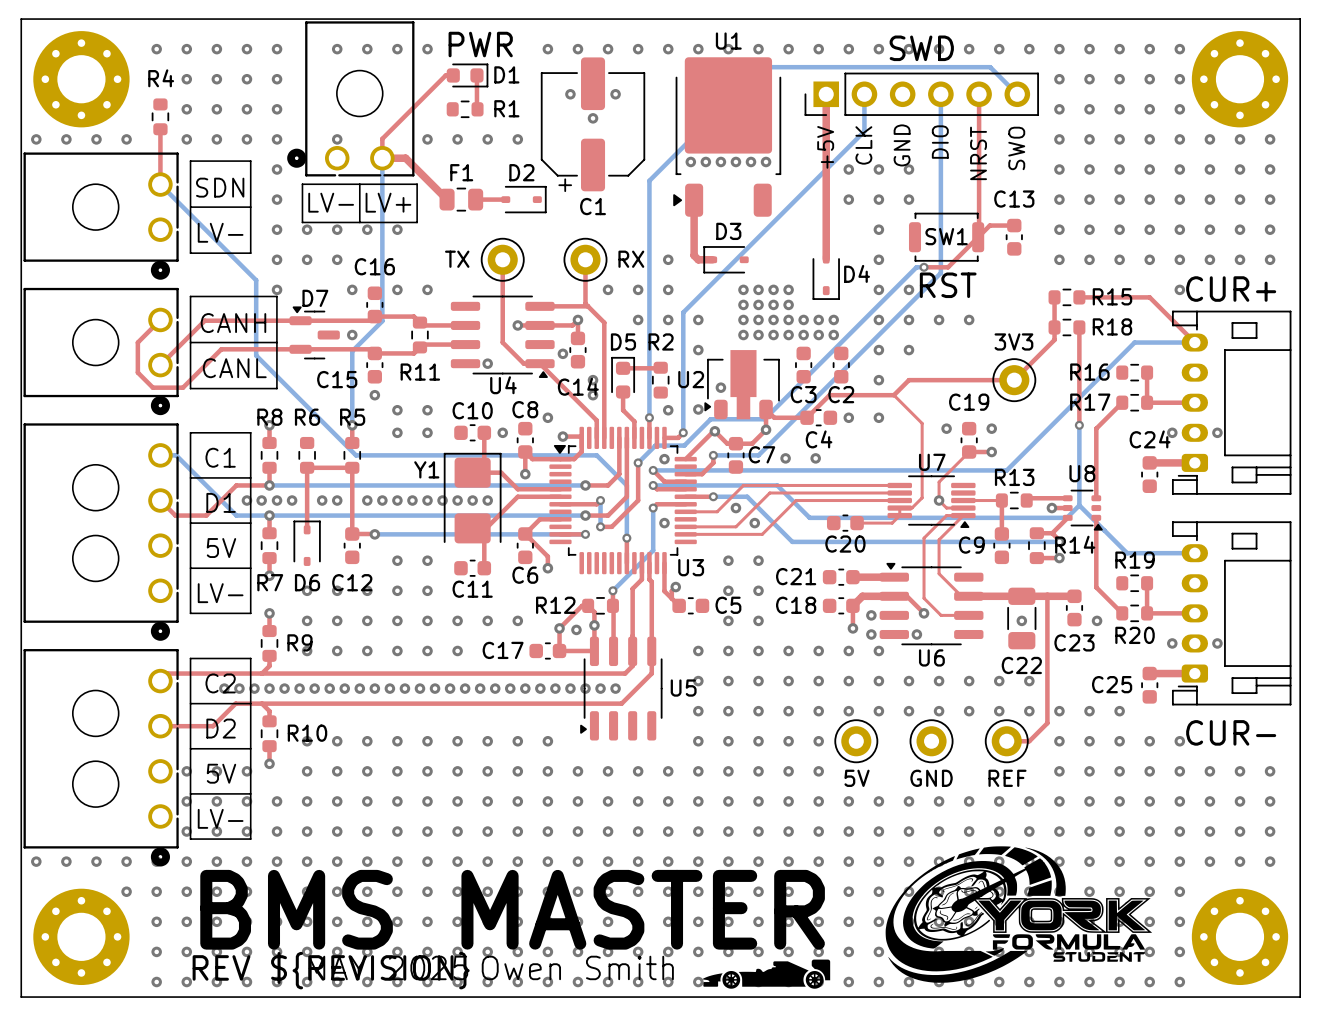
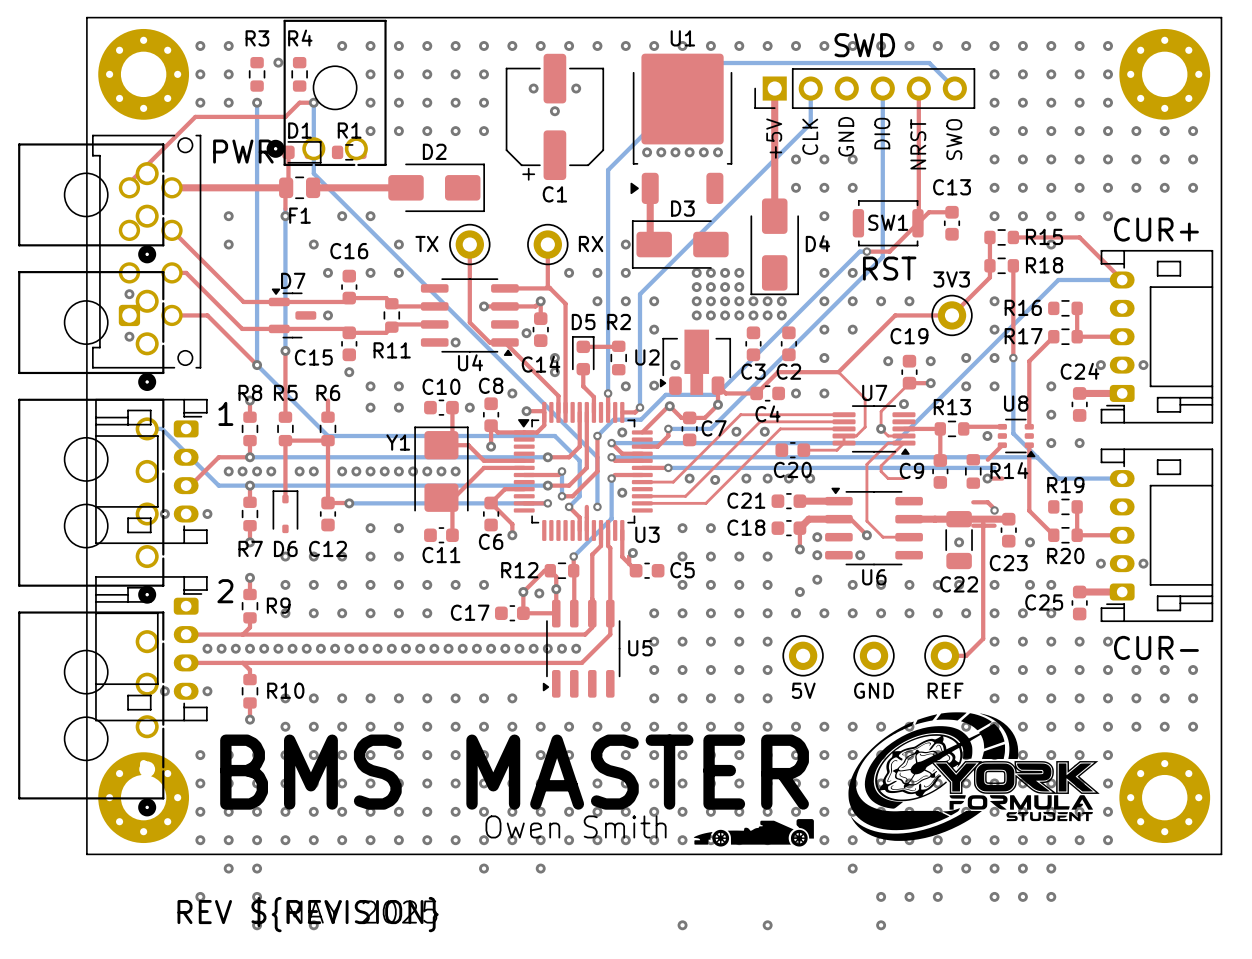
board edge: (96, 19) (21, 19) (21, 997) (1300, 997) (1300, 906) -> (86, 17) (86, 854) (1221, 854)
text position: PWR (480, 44) -> PWR (243, 151)
via: (156, 49) -> none
via: (186, 49) -> none
via: (277, 49) -> none
via: (337, 49) -> none
via: none -> (427, 45)
via: none -> (455, 45)
via: none -> (484, 45)
via: none -> (278, 62)
D1 name position: D1 (506, 74) -> D1 (299, 130)
top track: (453, 75) (445, 75) (382, 138) (382, 158) (405, 158) (447, 199) -> none
D1 position: (467, 75) -> (301, 152)
top track: (476, 75) (477, 109) -> none
part position: (81, 79) -> (143, 74)
via: (186, 79) -> none
R3: none -> (257, 74)
via: (277, 79) -> none
via: none -> (370, 74)
via: none -> (398, 74)
via: none -> (427, 74)
via: none -> (455, 74)
via: none -> (484, 74)
R1 name position: R1 (506, 108) -> R1 (349, 130)
via: (186, 109) -> none
bottom track: none -> (257, 102) (257, 365) (327, 436) (554, 436) (579, 460) (579, 496) (569, 506)
top track: none -> (313, 102) (299, 102) (285, 116) (195, 116) (129, 182)
bottom track: none -> (313, 102) (313, 173) (597, 457) (597, 506)
via: none -> (313, 102)
via: none -> (370, 102)
via: none -> (398, 102)
via: none -> (427, 102)
R1 position: (465, 109) -> (349, 152)
via: none -> (455, 102)
via: none -> (484, 102)
R4 position: (160, 116) -> (299, 74)
top track: (160, 129) (160, 184) -> none
via: (36, 139) -> none
via: (66, 139) -> none
via: (96, 139) -> none
via: (126, 139) -> none
via: (186, 139) -> none
via: (216, 139) -> none
via: (246, 139) -> none
via: (277, 139) -> none
via: (337, 139) -> none
via: none -> (370, 131)
bottom track: (382, 158) (382, 321) (352, 351) (352, 425) -> none
line: (190, 161) (190, 253) (250, 253) (250, 161) (190, 161) -> none
top track: none -> (288, 152) (288, 185)
via: (277, 169) -> none
F1 name position: F1 (461, 172) -> F1 (299, 215)
bottom track: (160, 184) (256, 280) (256, 355) (356, 455) (596, 455) (626, 485) (626, 538) -> none
line: (302, 184) (417, 184) (417, 222) (302, 222) (302, 184) -> none
line: (359, 184) (359, 222) -> none
D2 footprint: [501, 185, 547, 214] -> [388, 163, 485, 213]
text: SDN (220, 187) -> none
top track: none -> (171, 187) (286, 187)
via: (277, 199) -> none
top track: none -> (313, 187) (406, 187)
F1 position: (461, 199) -> (299, 187)
top track: (475, 199) (505, 199) -> none
top track: none -> (285, 188) (285, 209)
text: LV- (331, 202) -> none
text: LV+ (388, 202) -> none
line: (190, 207) (250, 207) -> none
bottom track: none -> (285, 209) (285, 350)
via: none -> (228, 216)
via: (277, 229) -> none
via: (337, 229) -> none
top track: (826, 229) (826, 259) -> none
via: (1209, 229) -> none
via: (1239, 229) -> none
via: (1270, 229) -> none
text: LV- (220, 232) -> none
D3 footprint: [703, 246, 749, 274] -> [631, 220, 729, 269]
D4 footprint: [812, 254, 840, 300] -> [750, 198, 799, 296]
top track: (694, 255) (698, 259) (712, 259) -> none
via: none -> (228, 244)
via: (277, 259) -> none
via: (307, 259) -> none
via: none -> (398, 244)
via: (1059, 259) -> none
via: (1089, 259) -> none
via: (1149, 259) -> none
via: (1179, 259) -> none
via: (1209, 259) -> none
via: (1239, 259) -> none
via: (1270, 259) -> none
part: none -> (146, 251)
via: (277, 289) -> none
via: (1179, 289) -> none
text position: CUR+ (1231, 289) -> CUR+ (1156, 229)
line: (190, 296) (190, 388) (276, 388) (276, 296) (190, 296) -> none
top track: (1054, 297) (1054, 339) (1014, 380) (908, 380) -> (989, 237) (989, 277) (952, 315) (895, 315) (852, 358)
R15 position: (1066, 297) -> (1001, 237)
top track: (1079, 297) (1149, 297) (1194, 342) -> (1013, 237) (1079, 237) (1122, 279)
via: none -> (129, 294)
top track: (160, 319) (137, 342) (137, 372) (152, 387) (183, 387) (221, 349) (261, 349) -> (171, 272) (186, 272) (242, 328)
via: none -> (994, 301)
top track: (262, 320) (204, 320) (160, 365) -> (243, 301) (171, 230)
text: CANH (233, 323) -> none
R18 position: (1066, 327) -> (1001, 265)
top track: none -> (171, 315) (207, 315) (257, 365)
text position: 3V3 (1013, 341) -> 3V3 (951, 279)
line: (190, 342) (276, 342) -> none
bottom track: (1194, 342) (1134, 342) (1006, 470) (954, 470) -> (1122, 279) (1058, 279) (895, 443)
via: none -> (994, 329)
via: none -> (129, 336)
text: CANL (234, 368) -> none
top track: none -> (285, 350) (285, 417)
via: none -> (285, 350)
R16 position: (1134, 372) -> (1065, 308)
top track: (1147, 372) (1147, 402) (1194, 402) -> (1077, 308) (1077, 336) (1122, 336)
part position: (1014, 380) -> (952, 315)
via: none -> (966, 358)
via: none -> (994, 358)
top track: (1079, 380) (1079, 425) -> (1013, 265) (1013, 308)
bottom track: none -> (1013, 358) (1013, 400)
via: none -> (888, 361)
via: none -> (930, 361)
via: none -> (257, 365)
via: none -> (1100, 365)
via: none -> (1143, 365)
top track: (1122, 402) (1096, 428) -> (1053, 336) (1029, 361) (1029, 403)
R17 position: (1134, 402) -> (1065, 336)
part position: (1231, 402) -> (1156, 336)
top track: none -> (930, 383) (909, 383) (881, 411) (881, 428) (888, 436) (903, 436)
via: none -> (930, 383)
via: none -> (966, 386)
via: none -> (994, 386)
via: none -> (1051, 386)
R6 name: R6 (307, 417) -> R5 (285, 392)
R5 name: R5 (352, 417) -> R6 (328, 392)
via: (352, 425) -> none
via position: (1079, 425) -> (1013, 358)
via: (946, 428) -> none
via: (991, 428) -> none
via: none -> (903, 404)
line: (190, 432) (250, 432) (250, 613) (190, 613) (190, 432) -> none
via: (1172, 432) -> none
via: (1217, 432) -> none
C19 position: (969, 440) -> (909, 372)
via: none -> (1051, 414)
top track: (991, 451) (969, 451) (939, 482) (939, 494) -> none
via: (991, 451) -> none
top track: (922, 453) (922, 497) (911, 508) (899, 508) (899, 515) (892, 523) (857, 523) -> (865, 427) (856, 436) (844, 436) (844, 443) (836, 450) (803, 450)
top track: (1096, 453) (1096, 472) -> (1029, 469) (1029, 487)
via: none -> (881, 428)
text: C1 (220, 457) -> 1 (225, 413)
bottom track: (1079, 460) (1079, 505) -> (1013, 433) (1058, 478) (1122, 478)
via: none -> (987, 436)
top track: (1149, 462) (1194, 462) -> (1079, 393) (1122, 393)
via: none -> (1051, 443)
via: none -> (1079, 443)
C24 position: (1149, 474) -> (1079, 404)
line: (190, 477) (250, 477) -> none
bottom track: (777, 485) (809, 517) (1066, 517) (1079, 505) -> (728, 457) (1037, 457)
top track: (899, 485) (743, 485) (717, 511) -> (844, 414) (740, 414) (671, 482)
top track: (899, 492) (769, 492) (735, 526) (731, 526) -> (844, 421) (760, 421) (685, 496)
bottom track: (747, 496) (792, 541) (1059, 541) -> (700, 467) (994, 467)
top track: (1067, 498) (1028, 498) (1026, 500) -> (1002, 426) (965, 426) (963, 428)
top track: (160, 500) (175, 515) (201, 515) -> none
part: none -> (151, 471)
top track: (899, 500) (796, 500) (762, 534) (753, 534) -> (844, 428) (780, 428) (705, 503)
via: (939, 500) -> none
top track: (963, 500) (1001, 500) (1001, 533) -> (903, 428) (940, 428) (940, 460)
R13 position: (1014, 500) -> (952, 428)
U7 position: (931, 501) -> (874, 430)
text: D1 (221, 502) -> none
bottom track: (1079, 505) (1127, 553) (1194, 553) -> none
via: none -> (746, 478)
via: none -> (767, 478)
via: none -> (788, 478)
via: none -> (810, 478)
U8 position: (1082, 510) -> (1016, 437)
top track: (1067, 517) (1052, 533) -> (1002, 445) (987, 459)
line: (190, 523) (250, 523) -> none
via position: (754, 523) -> (715, 479)
C20 position: (845, 523) -> (792, 450)
top track: none -> (569, 506) (579, 517) (579, 530)
via: none -> (569, 506)
via: (626, 538) -> none
via: none -> (597, 506)
top track: (924, 538) (946, 515) (963, 515) (939, 539) (939, 573) (961, 596) -> (866, 506) (866, 464) (888, 443) (903, 443) (881, 465)
top track: (1096, 542) (1096, 587) (1122, 613) -> (1029, 510) (1053, 535)
via: none -> (164, 514)
via: none -> (207, 514)
C9 position: (1001, 545) -> (940, 471)
R14 position: (1036, 545) -> (973, 471)
text: 5V (221, 548) -> none
top track: none -> (983, 519) (983, 561)
top track: (924, 553) (924, 598) (941, 615) (968, 615) -> (866, 521) (883, 537) (909, 537)
via: (1059, 558) -> none
line: (190, 568) (250, 568) -> none
via: none -> (866, 535)
via: none -> (817, 537)
via: none -> (959, 542)
via: none -> (1030, 542)
C21 position: (841, 577) -> (788, 501)
top track: (852, 577) (894, 577) -> (799, 501) (838, 501)
via: none -> (799, 549)
R19 position: (1134, 583) -> (1065, 506)
top track: (1147, 583) (1147, 613) (1194, 613) -> (1077, 506) (1077, 535) (1122, 535)
via: none -> (817, 555)
via: none -> (860, 555)
via: none -> (739, 556)
via: none -> (767, 556)
text: LV- (220, 593) -> none
top track: (968, 596) (1074, 596) -> (909, 519) (1008, 519)
via: none -> (1100, 563)
via: none -> (1143, 563)
U6 position: (931, 604) -> (874, 526)
C18 position: (841, 605) -> (788, 528)
C23 position: (1074, 607) -> (1008, 530)
top track: (924, 613) (906, 596) (862, 596) (852, 605) (852, 628) -> (866, 535) (850, 519) (808, 519) (799, 528) (799, 549)
via: (924, 613) -> none
R20 position: (1134, 613) -> (1065, 535)
part position: (1231, 613) -> (1156, 535)
C22 position: (1021, 618) -> (959, 540)
via: none -> (739, 584)
via: none -> (767, 584)
via: none -> (852, 584)
via: none -> (881, 584)
via: none -> (909, 584)
via: none -> (937, 584)
via: none -> (994, 584)
via: none -> (1051, 584)
text: none -> 2 (225, 591)
via: (871, 634) -> none
via: (916, 634) -> none
via: (1172, 643) -> none
via: (1217, 643) -> none
via: none -> (852, 613)
via: none -> (881, 613)
via: none -> (909, 613)
via: none -> (937, 613)
via: none -> (966, 613)
via: none -> (994, 613)
via: none -> (1022, 613)
via: none -> (1051, 613)
line: (190, 658) (190, 839) (250, 839) (250, 658) (190, 658) -> none
top track: (201, 673) (167, 673) (160, 681) -> none
top track: (1149, 673) (1194, 673) -> (1079, 592) (1122, 592)
top track: (1047, 678) (1047, 723) (1029, 741) (1006, 741) -> (983, 638) (966, 655) (944, 655)
via: (848, 681) -> none
via: (878, 681) -> none
via: (908, 681) -> none
via: (939, 681) -> none
via: (969, 681) -> none
via: (999, 681) -> none
via: (1029, 681) -> none
via: none -> (994, 641)
via: none -> (1022, 641)
via: none -> (1051, 641)
via: none -> (1079, 641)
via: none -> (1108, 641)
text: C2 (220, 683) -> none
C25 position: (1149, 685) -> (1079, 602)
part: none -> (151, 648)
part: none -> (803, 655)
part: none -> (874, 655)
part: none -> (944, 655)
line: (190, 703) (250, 703) -> none
top track: (235, 703) (213, 726) (160, 726) -> (218, 662) (186, 662)
via: (848, 711) -> none
via: (878, 711) -> none
via: (908, 711) -> none
via: (939, 711) -> none
via: (969, 711) -> none
via: (999, 711) -> none
via: (1029, 711) -> none
via: none -> (1079, 670)
via: none -> (1108, 670)
via: none -> (1136, 670)
via: none -> (1164, 670)
via: none -> (1193, 670)
text: D2 (221, 728) -> none
text position: CUR- (1231, 732) -> CUR- (1156, 647)
via: none -> (164, 691)
via: none -> (207, 691)
part: (856, 741) -> none
part: (931, 741) -> none
part: (1006, 741) -> none
via: none -> (1136, 698)
via: none -> (1164, 698)
via: none -> (1193, 698)
line: (190, 748) (250, 748) -> none
via: (186, 771) -> none
via: (216, 771) -> none
via: (246, 771) -> none
via: none -> (796, 726)
via: none -> (824, 726)
via: none -> (852, 726)
via: none -> (881, 726)
via: none -> (909, 726)
via: none -> (966, 726)
text: 5V (221, 773) -> none
text position: 5V (857, 778) -> 5V (803, 690)
text position: GND (931, 778) -> GND (874, 690)
text position: REF (1007, 778) -> REF (945, 690)
line: (190, 793) (250, 793) -> none
via: (186, 801) -> none
via: (1209, 801) -> none
via: (1239, 801) -> none
via: (1270, 801) -> none
text: LV- (220, 818) -> none
via: (186, 831) -> none
via: (1209, 831) -> none
via: (1239, 831) -> none
via: (1270, 831) -> none
via: (36, 861) -> none
via: (66, 861) -> none
via: (96, 861) -> none
via: (126, 861) -> none
via: (186, 861) -> none
via: (1209, 861) -> none
via: (1239, 861) -> none
via: (1270, 861) -> none
drawing: none -> [712, 829, 730, 847]
drawing: none -> [790, 829, 808, 847]
via: (126, 891) -> none
via: (156, 891) -> none
via: (186, 891) -> none
text position: BMS MASTER (512, 909) -> BMS MASTER (514, 772)
drawing position: (1018, 914) -> (974, 776)
via: (156, 921) -> none
via: (186, 921) -> none
via: (216, 921) -> none
via: (307, 921) -> none
via: (337, 921) -> none
via: (367, 921) -> none
via: (397, 921) -> none
via: (427, 921) -> none
via: (457, 921) -> none
via: (608, 921) -> none
via: (668, 921) -> none
via: (698, 921) -> none
via: (728, 921) -> none
via: (758, 921) -> none
via: (788, 921) -> none
via: (818, 921) -> none
via: (848, 921) -> none
via: (878, 921) -> none
via: (939, 921) -> none
via: (969, 921) -> none
via: (1149, 921) -> none
via: (1179, 921) -> none
part position: (81, 936) -> (143, 797)
part position: (1239, 936) -> (1164, 797)
via: (156, 951) -> none
via: (186, 951) -> none
via: (246, 951) -> none
via: (307, 951) -> none
via: (337, 951) -> none
via: (367, 951) -> none
via: (397, 951) -> none
via: (427, 951) -> none
via: (457, 951) -> none
via: (487, 951) -> none
via: (517, 951) -> none
via: (547, 951) -> none
via: (577, 951) -> none
via: (608, 951) -> none
via: (638, 951) -> none
via: (668, 951) -> none
via: (698, 951) -> none
via: (728, 951) -> none
via: (758, 951) -> none
via: (788, 951) -> none
via: (818, 951) -> none
via: (848, 951) -> none
via: (878, 951) -> none
via: (1029, 951) -> none
via: (1149, 951) -> none
via: (1179, 951) -> none
text position: Owen Smith (577, 967) -> Owen Smith (576, 826)
drawing position: (820, 969) -> (805, 828)
drawing: [722, 971, 741, 989] -> none
drawing: [805, 971, 824, 989] -> none
drawing position: (773, 974) -> (760, 832)
drawing position: (712, 979) -> (703, 838)
via: (156, 981) -> none
via: (186, 981) -> none
via: (216, 981) -> none
via: (246, 981) -> none
via: (307, 981) -> none
via: (367, 981) -> none
via: (397, 981) -> none
via: (427, 981) -> none
via: (457, 981) -> none
via: (487, 981) -> none
via: (517, 981) -> none
via: (547, 981) -> none
via: (577, 981) -> none
via: (608, 981) -> none
via: (638, 981) -> none
via: (668, 981) -> none
via: (698, 981) -> none
via: (848, 981) -> none
via: (878, 981) -> none
via: (908, 981) -> none
via: (969, 981) -> none
via: (999, 981) -> none
via: (1029, 981) -> none
via: (1059, 981) -> none
via: (1089, 981) -> none
via: (1119, 981) -> none
via: (1149, 981) -> none
via: (1179, 981) -> none

